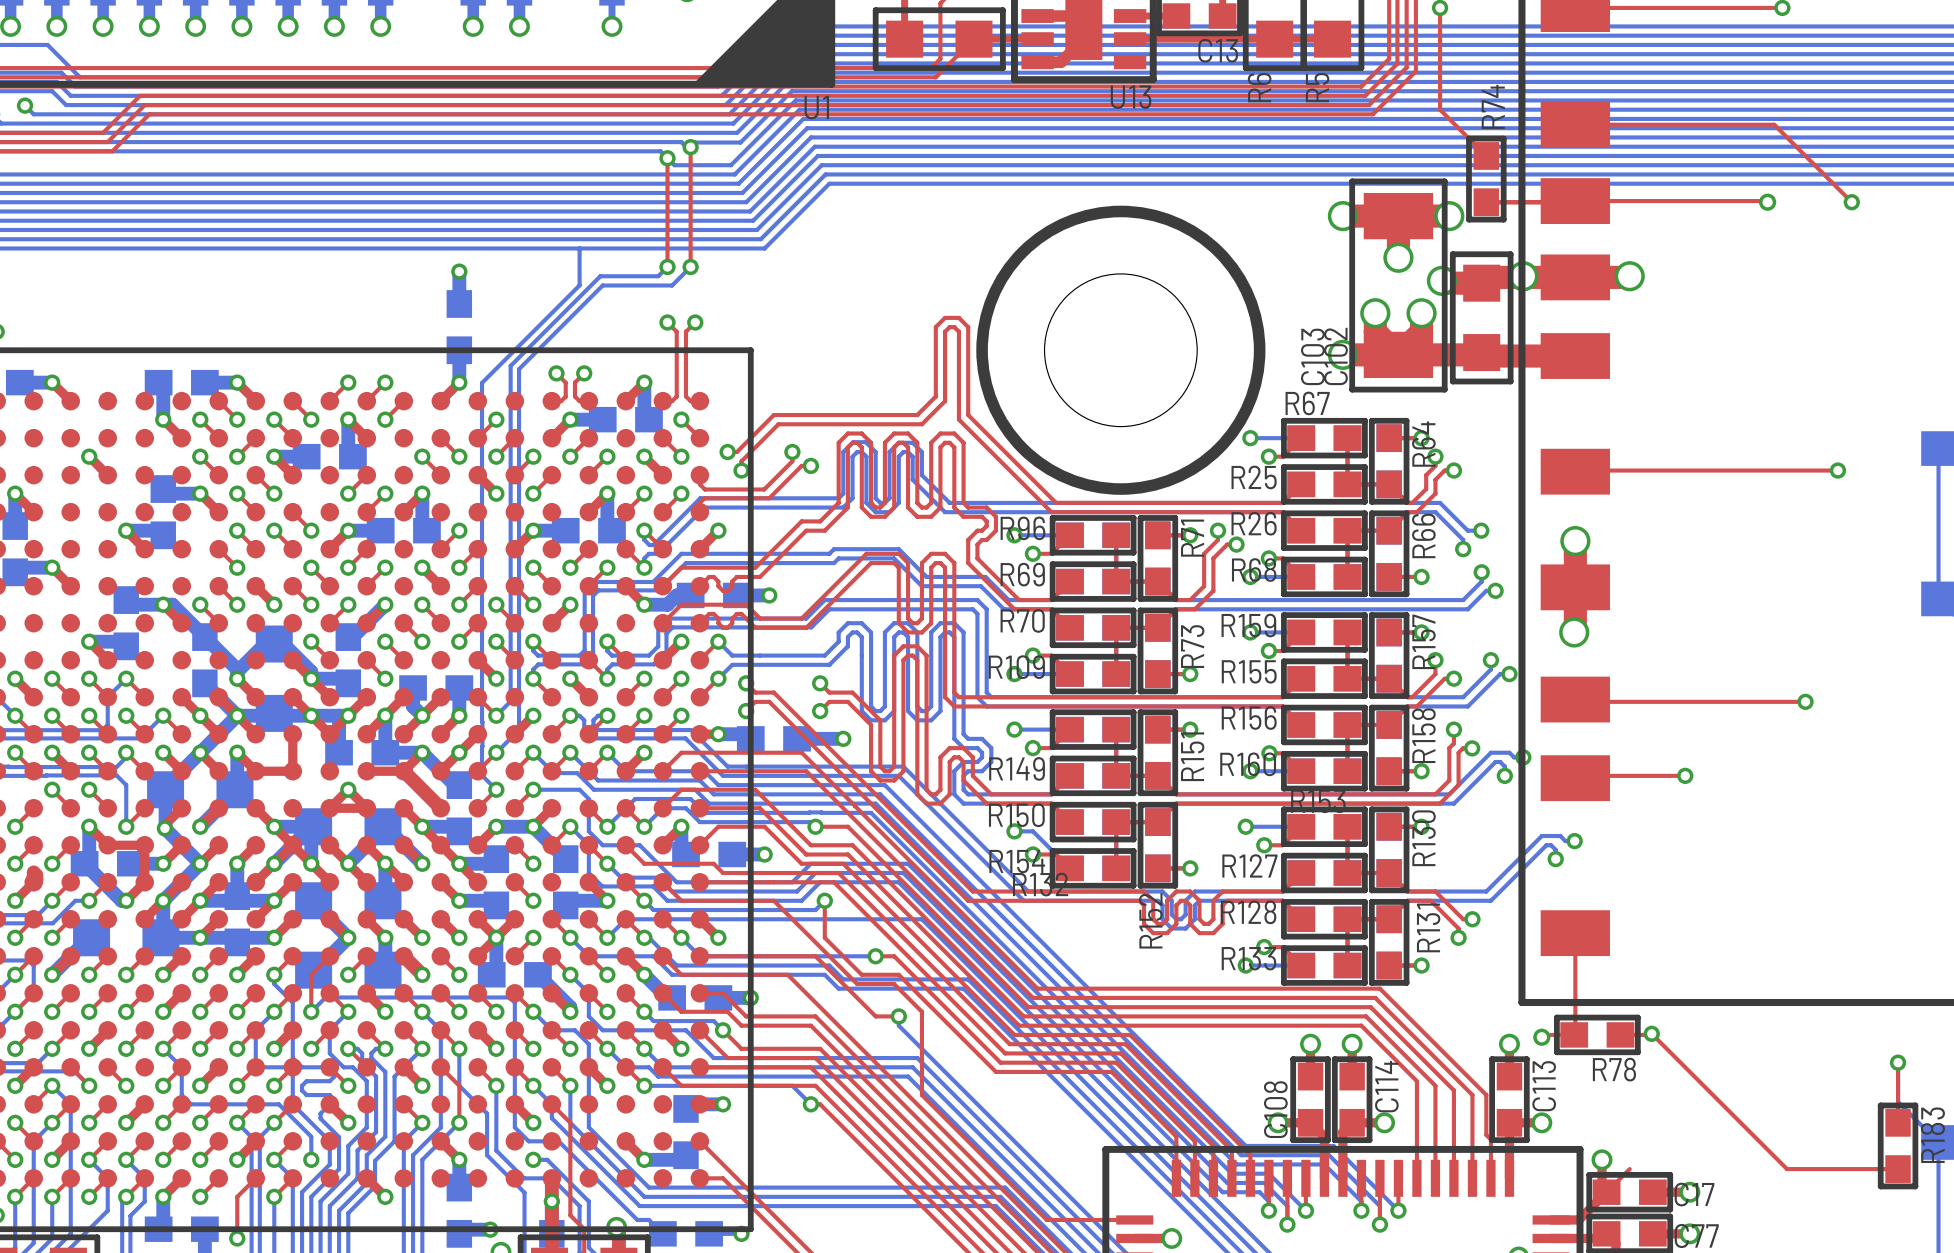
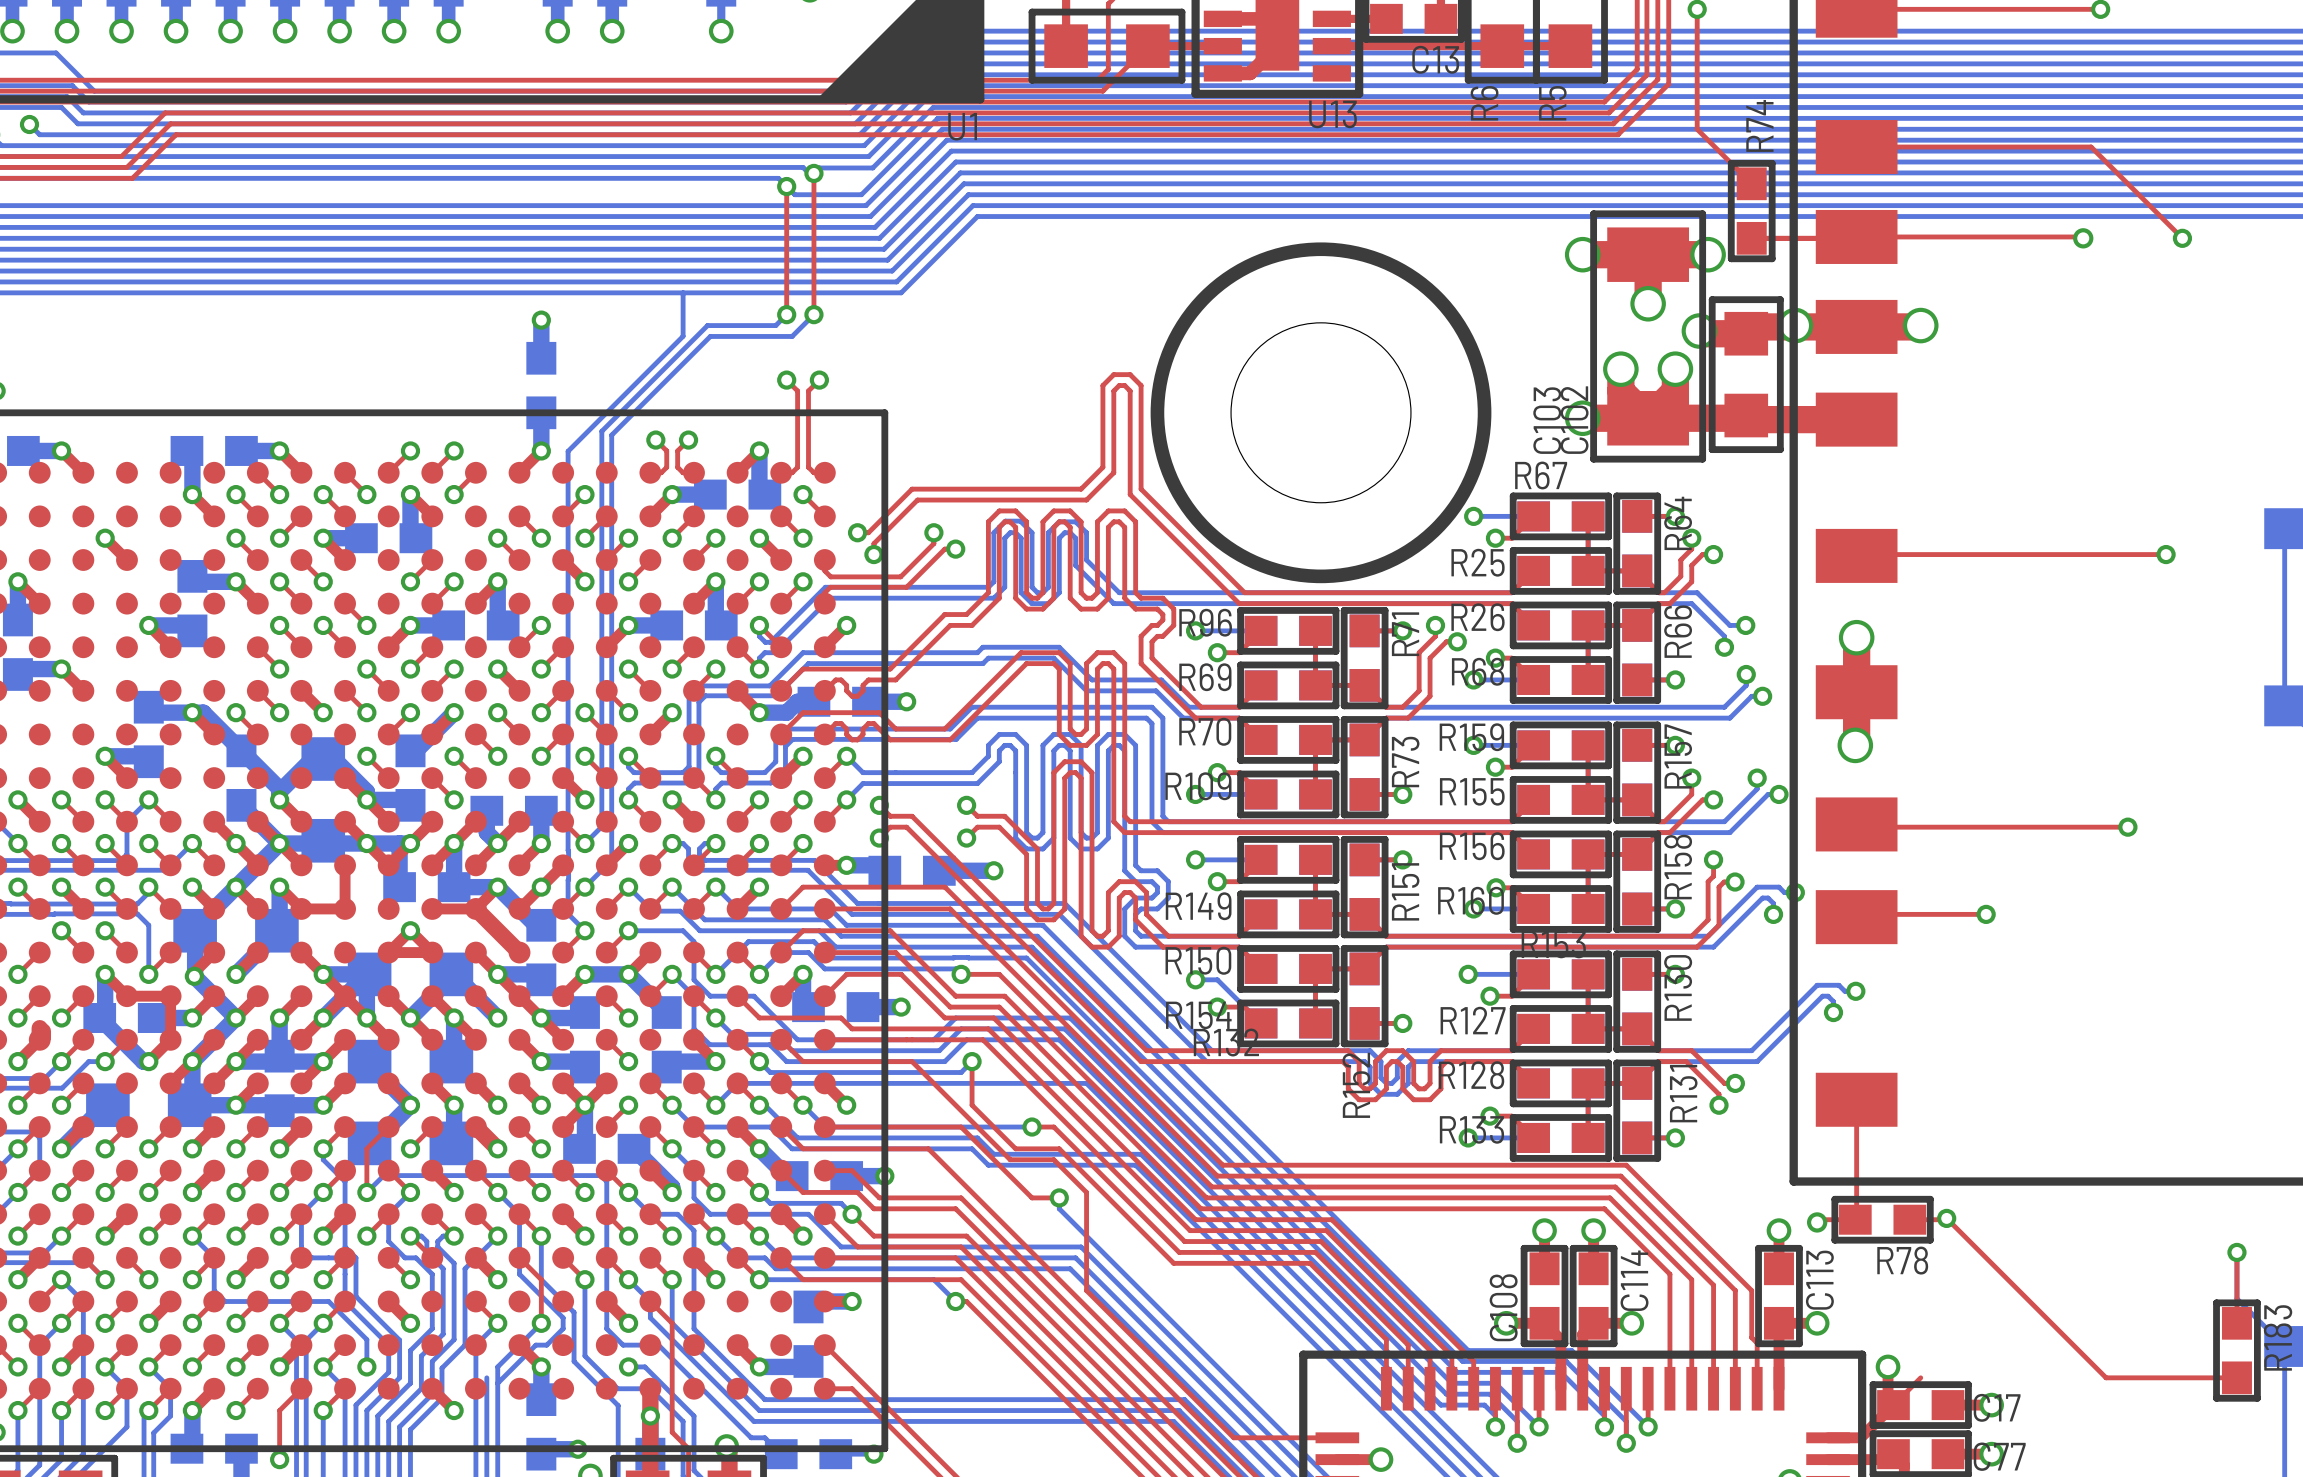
bottom track: (302, 1067) (329, 1067) (334, 1071) (334, 1076) (329, 1081) (306, 1081) (302, 1085) -> (355, 1257) (355, 1279)
bottom track: (440, 1081) (440, 1127) (413, 1155) (413, 1169) -> (519, 1274) (563, 1317) (563, 1328) (546, 1345) (535, 1345) (497, 1383)
bottom track: (302, 1090) (306, 1095) (329, 1095) (333, 1099) (333, 1104) (320, 1113) (320, 1118) -> (355, 1285) (355, 1296) (377, 1318)

